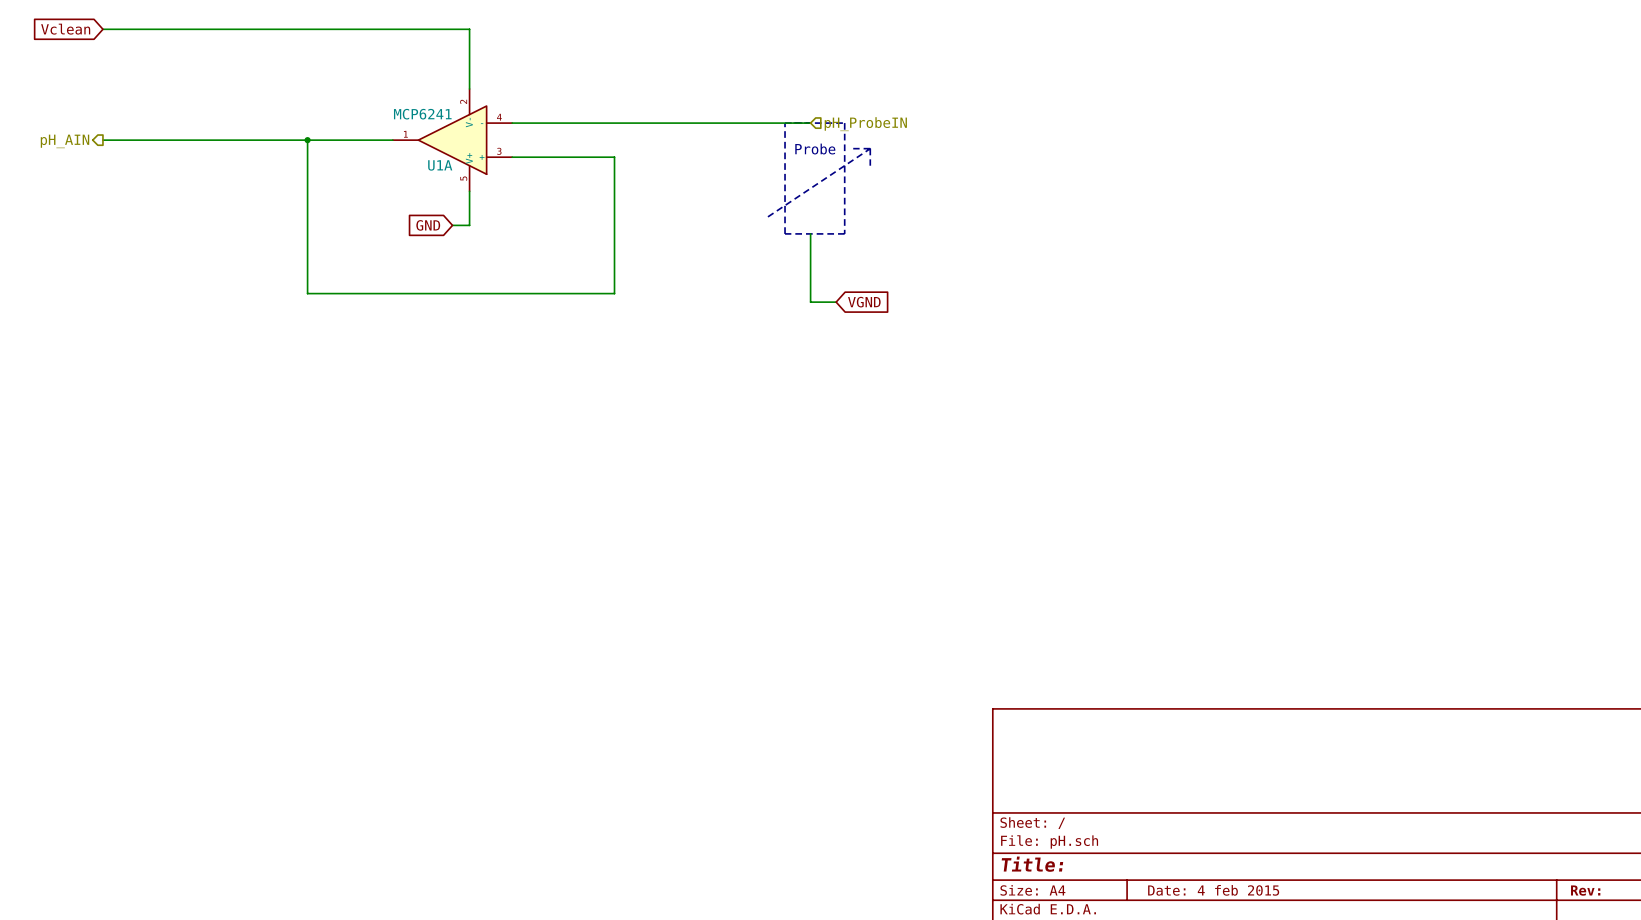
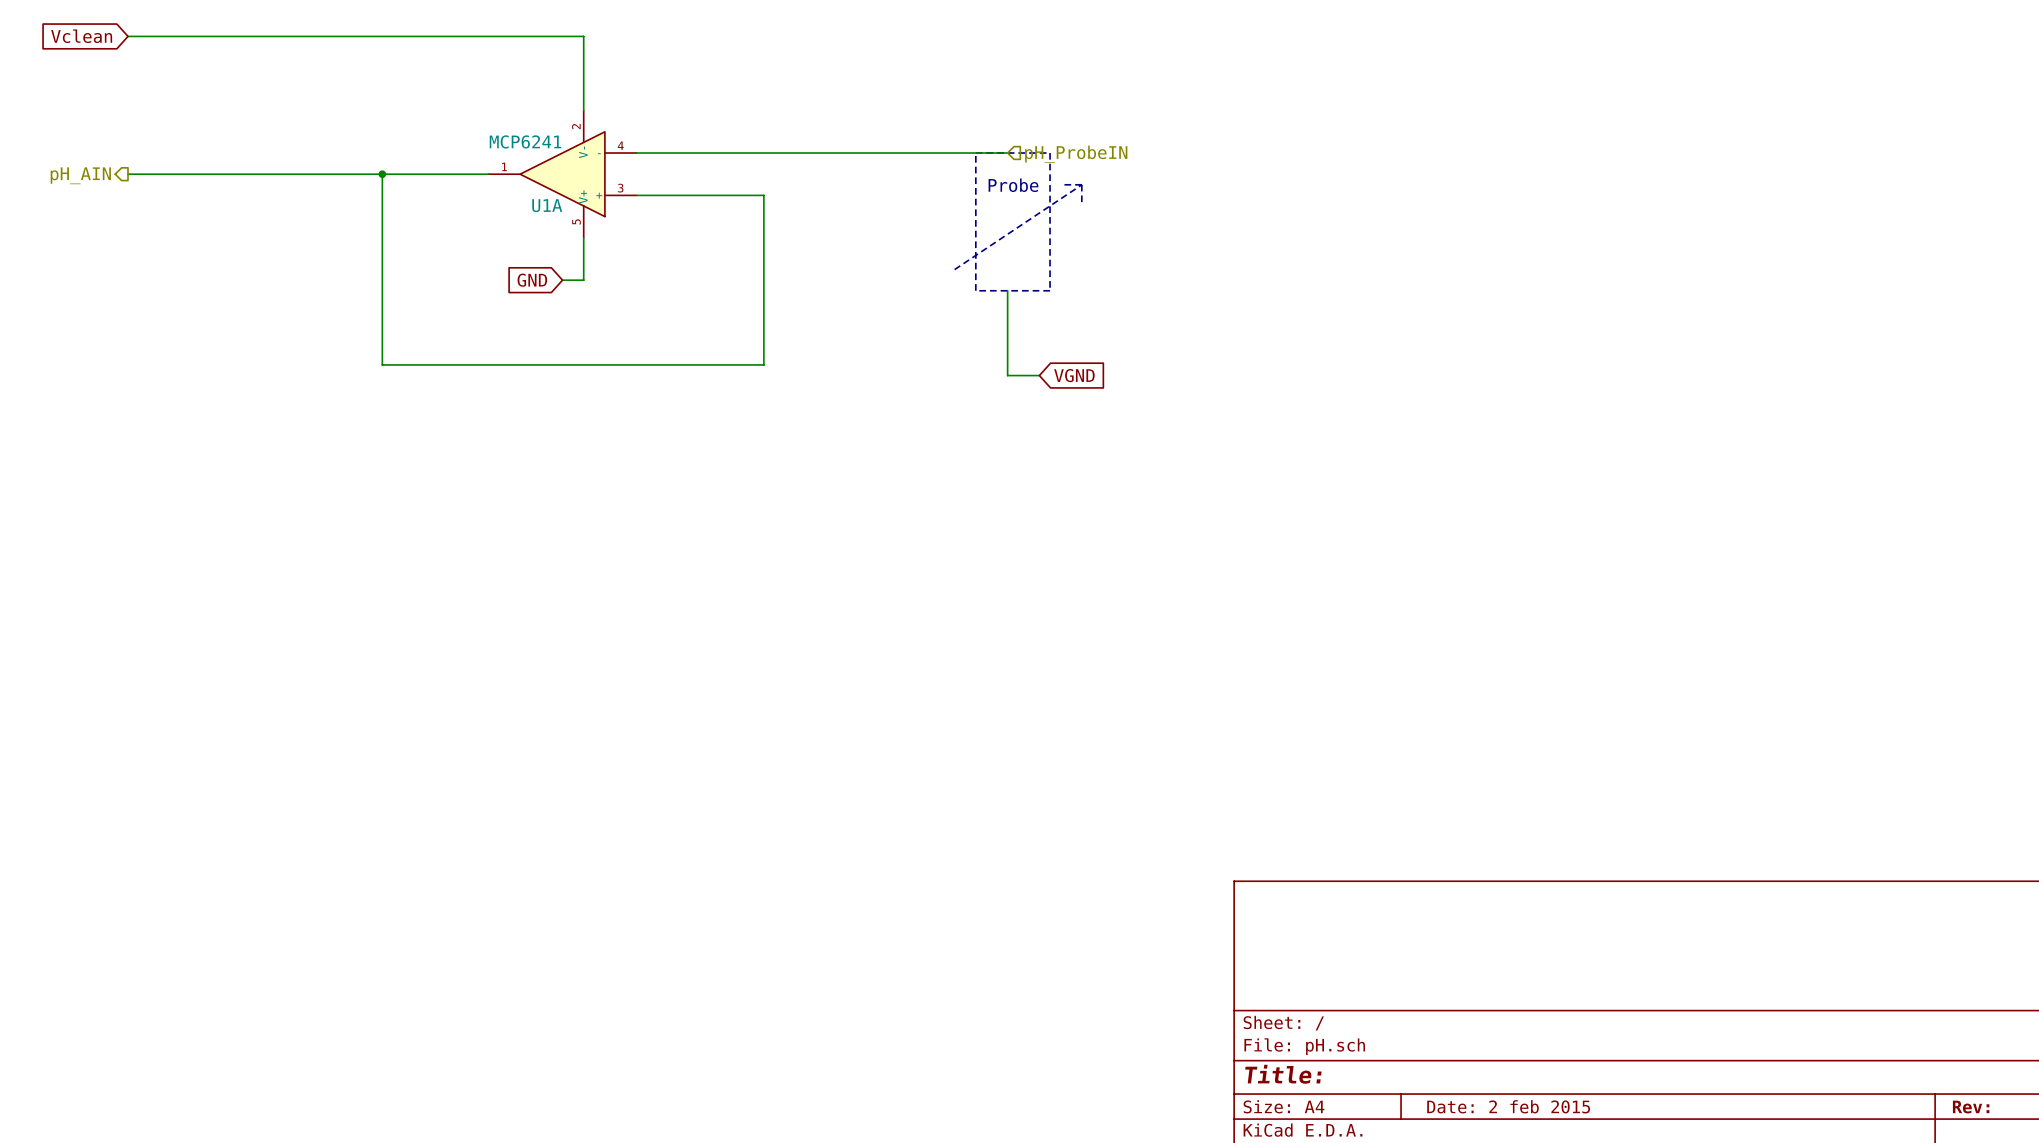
title block: Date: 4 feb 2015 (1213, 890) -> Date: 2 feb 2015 (1508, 1106)

